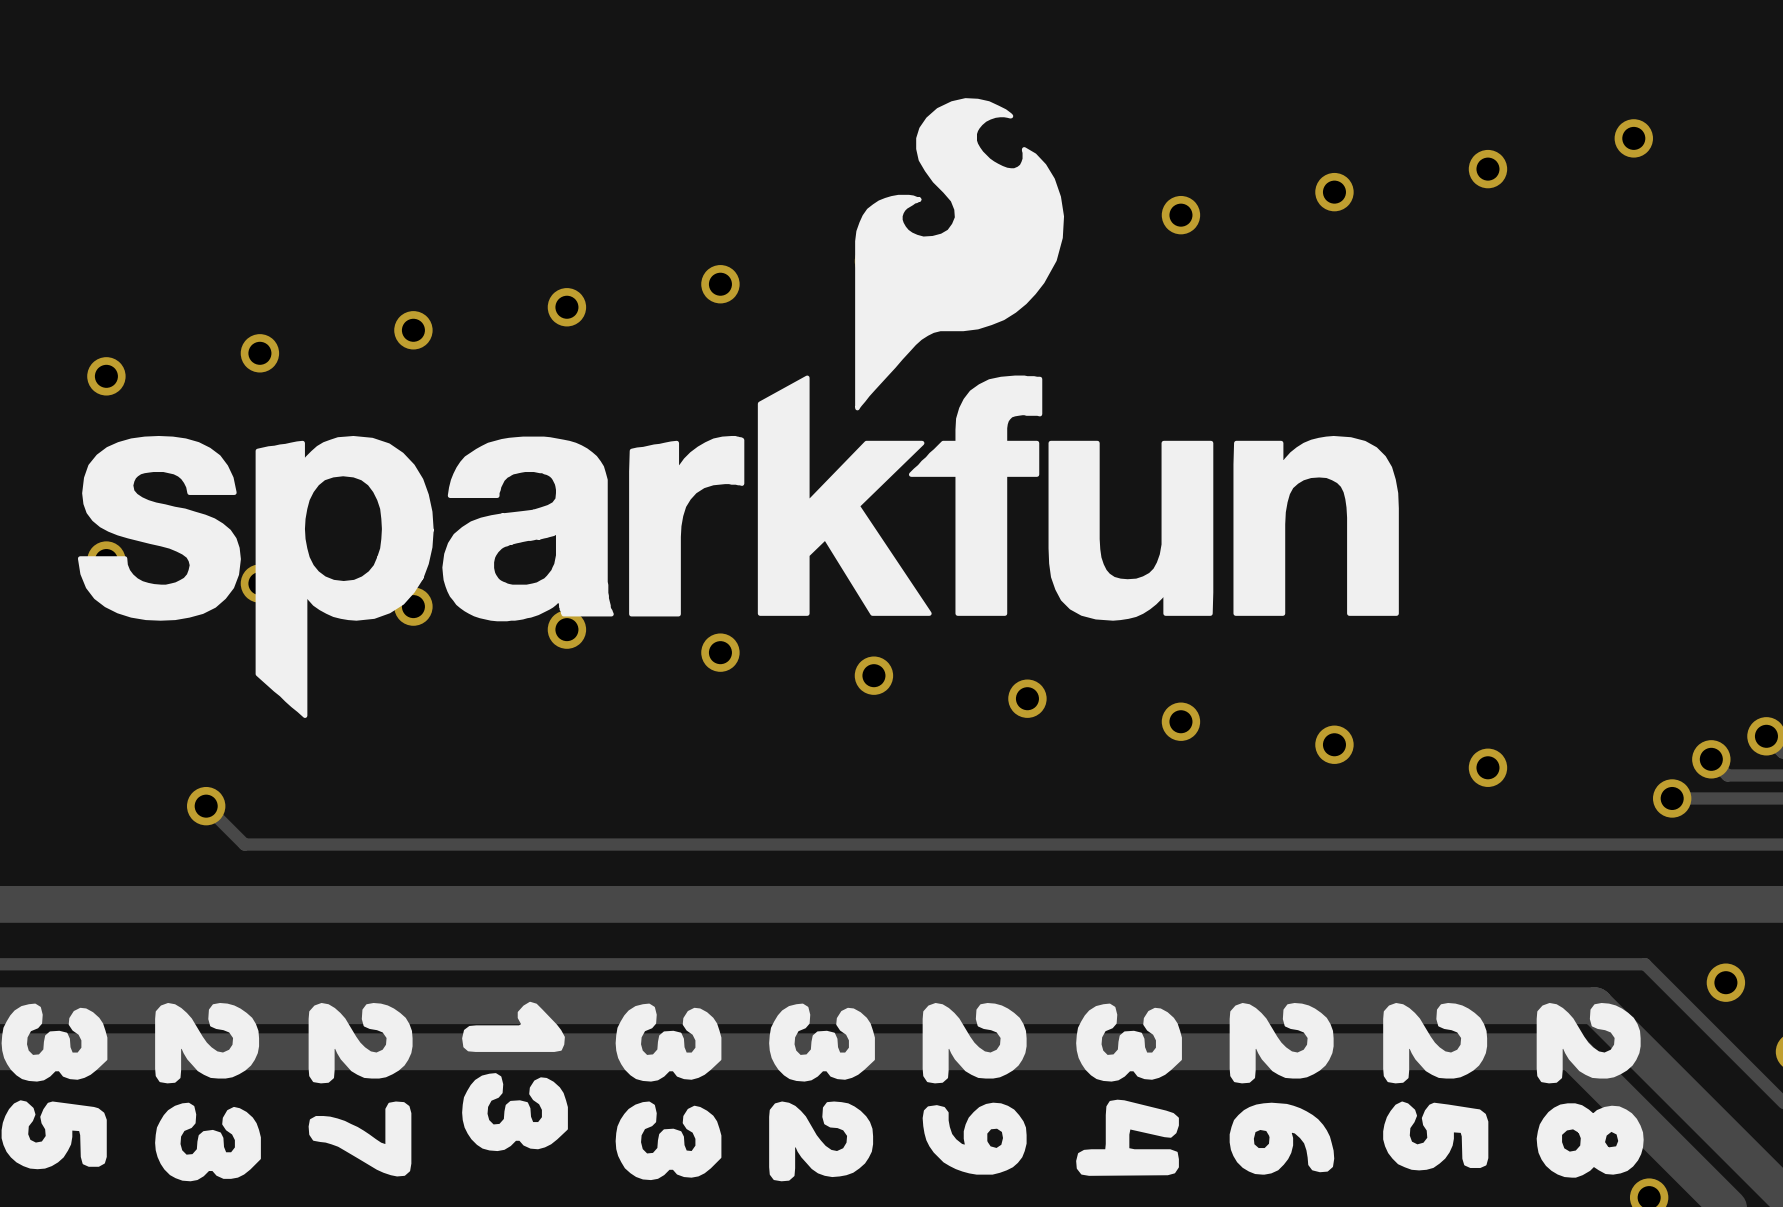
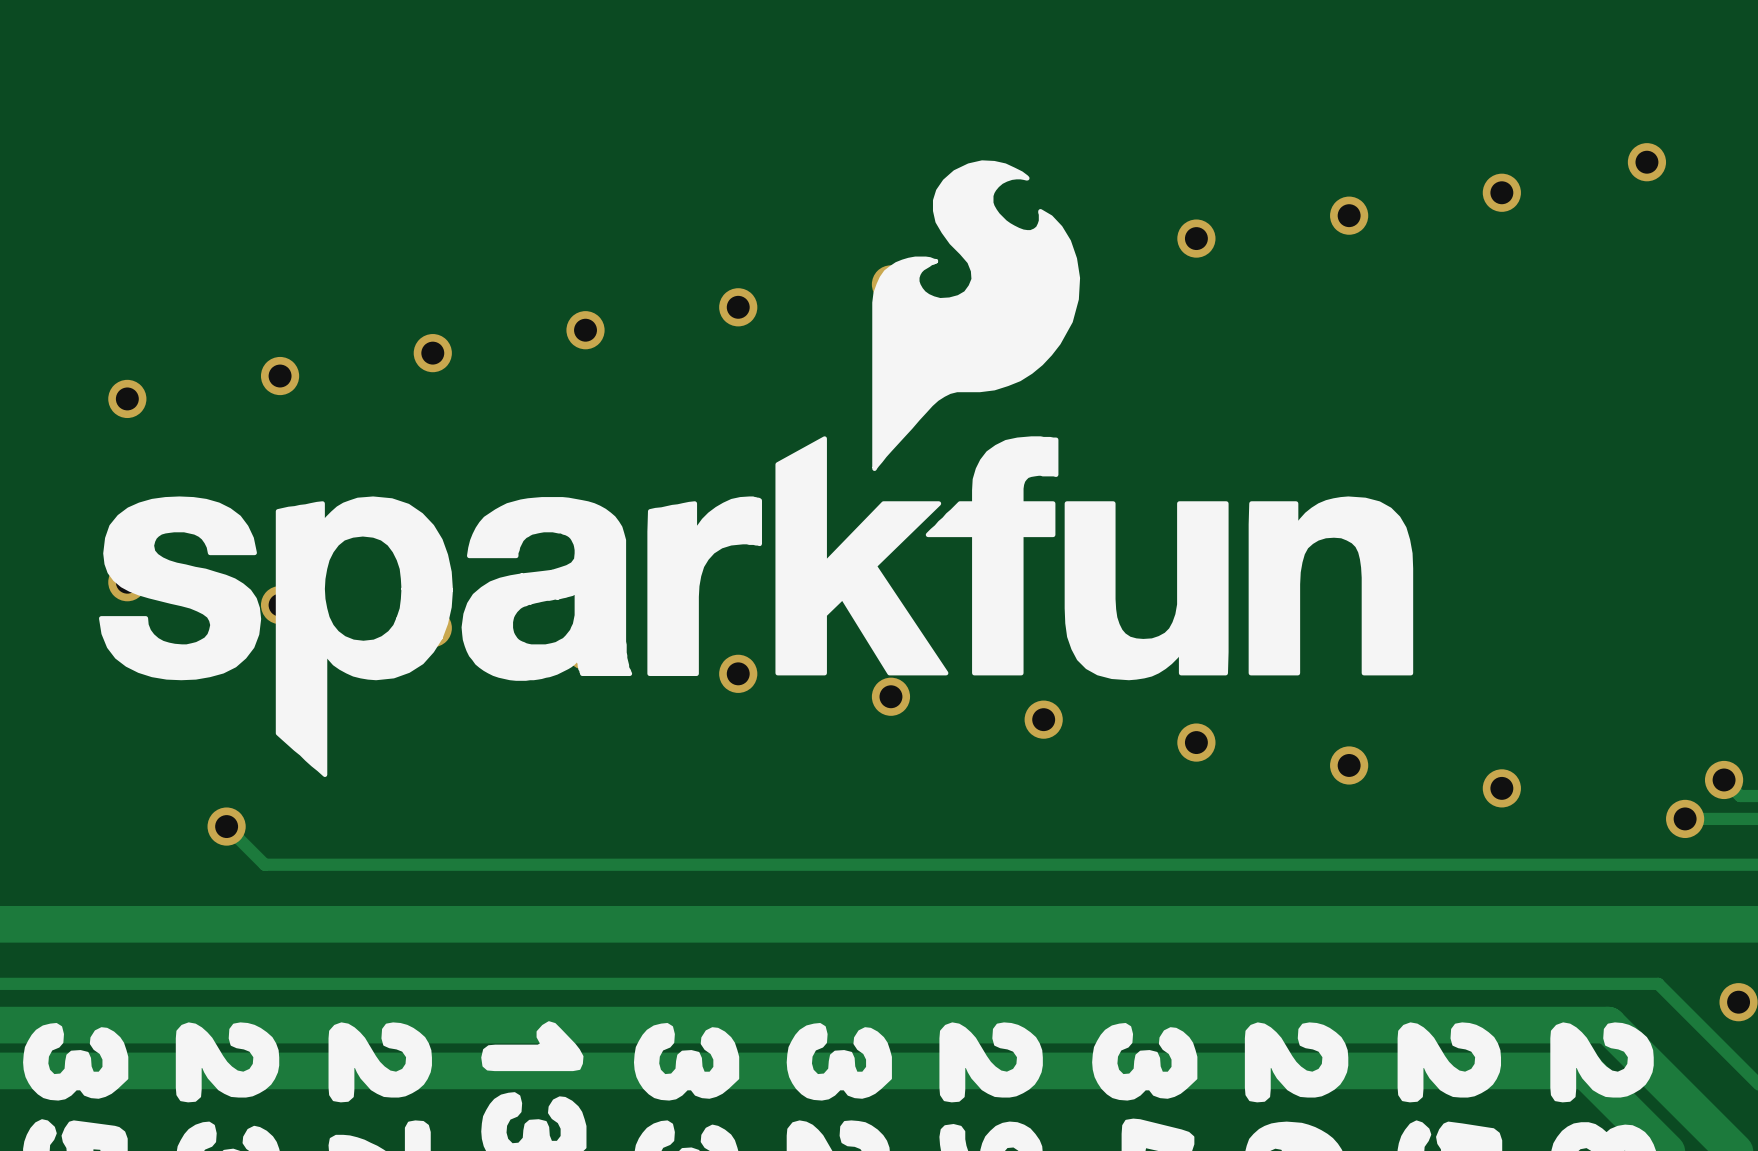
drawing position: (738, 408) -> (756, 468)

